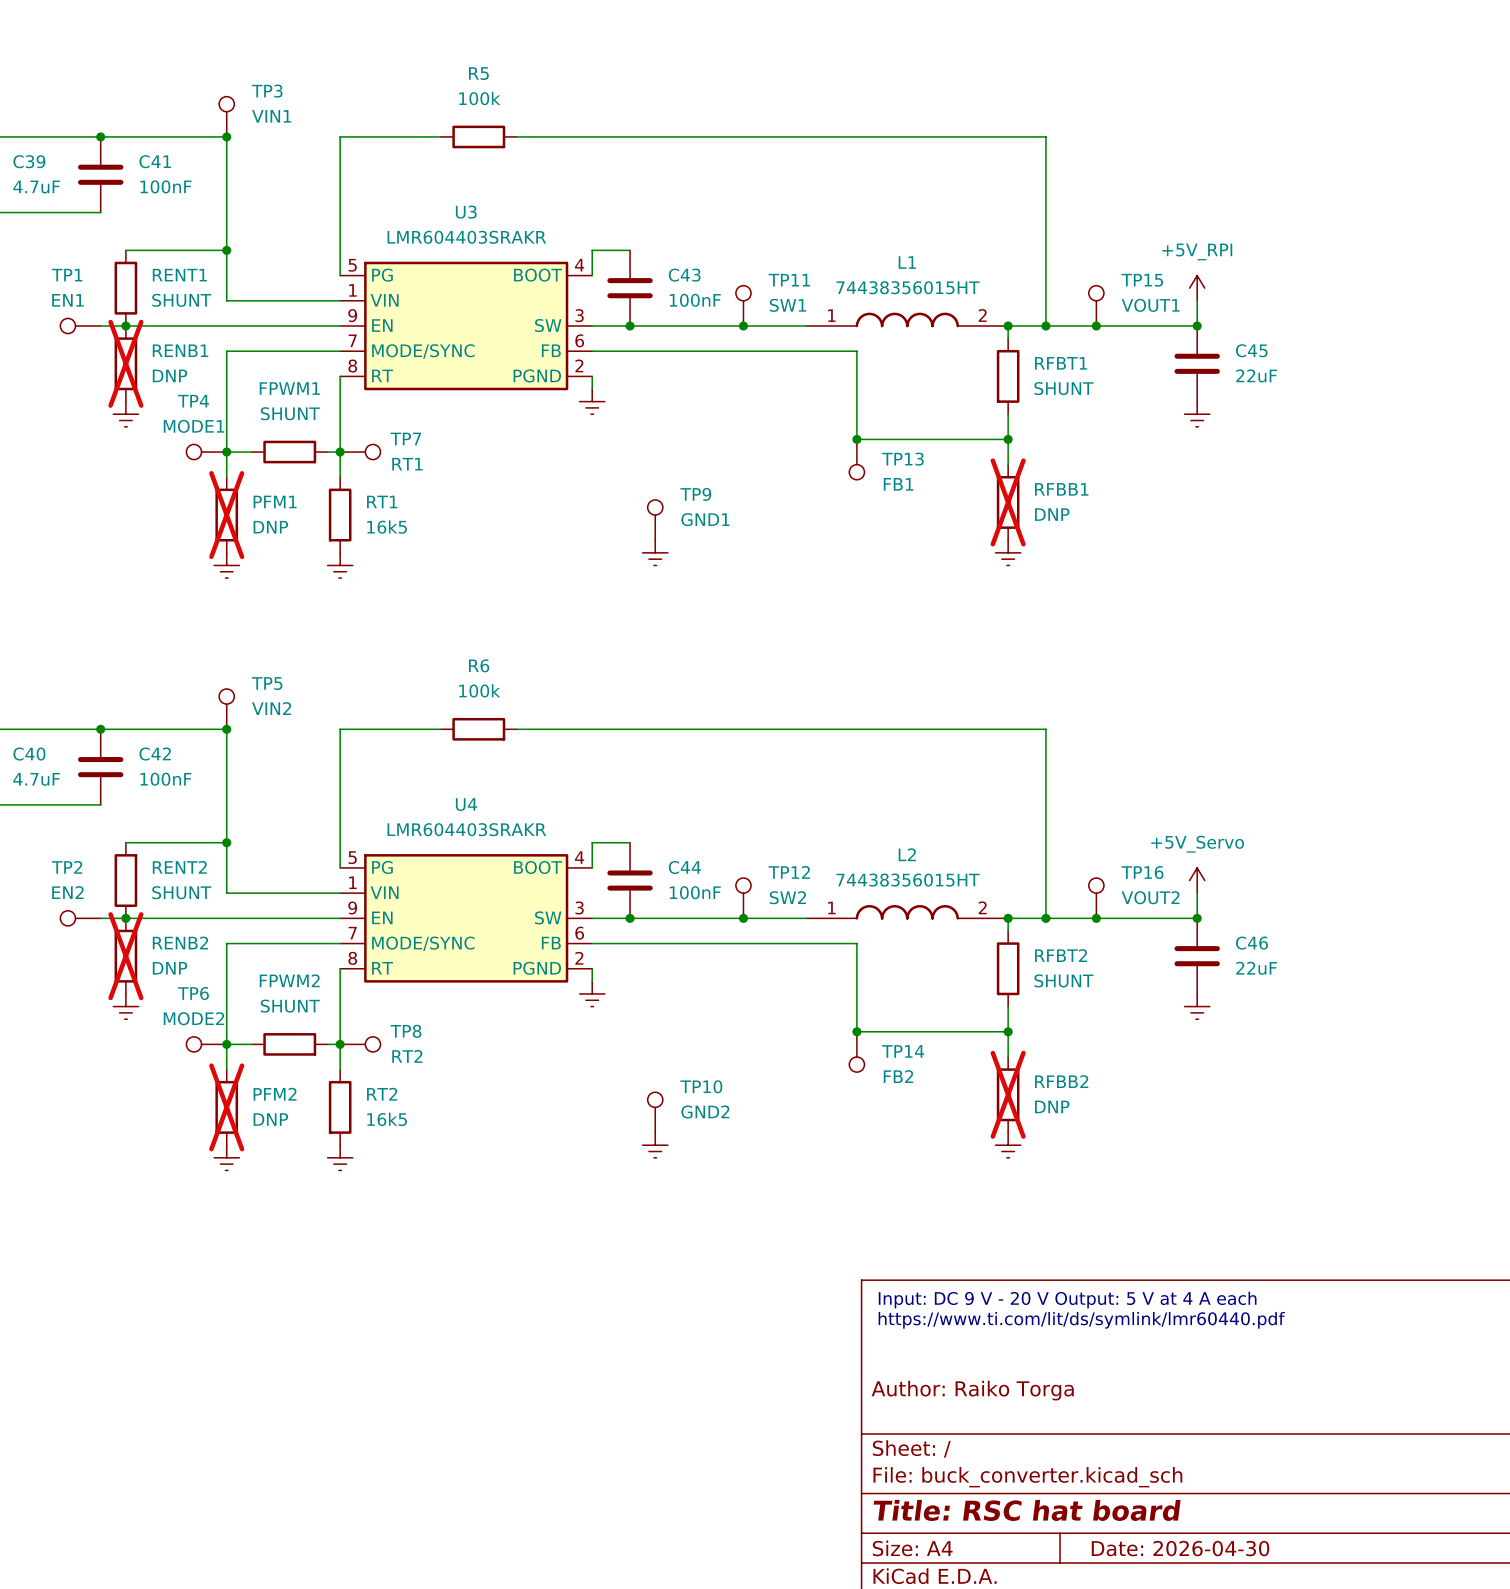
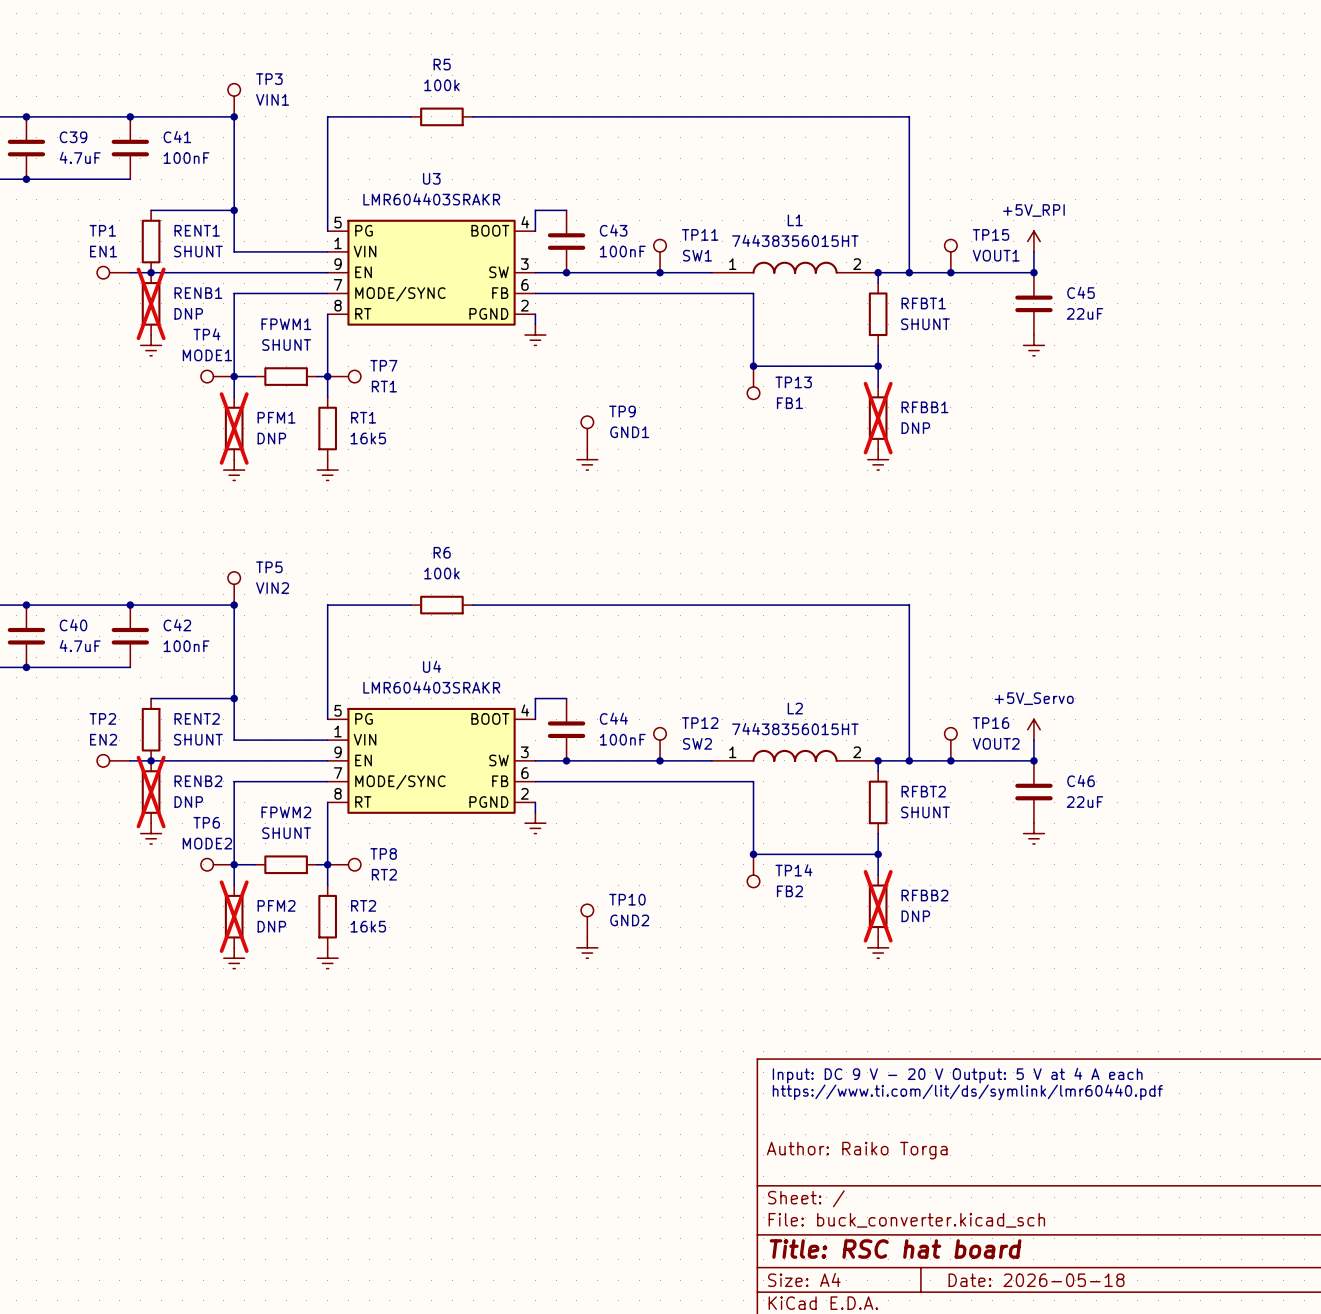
title block: Date: 2026-04-30 (1180, 1548) -> Date: 2026-05-18 (1036, 1280)

